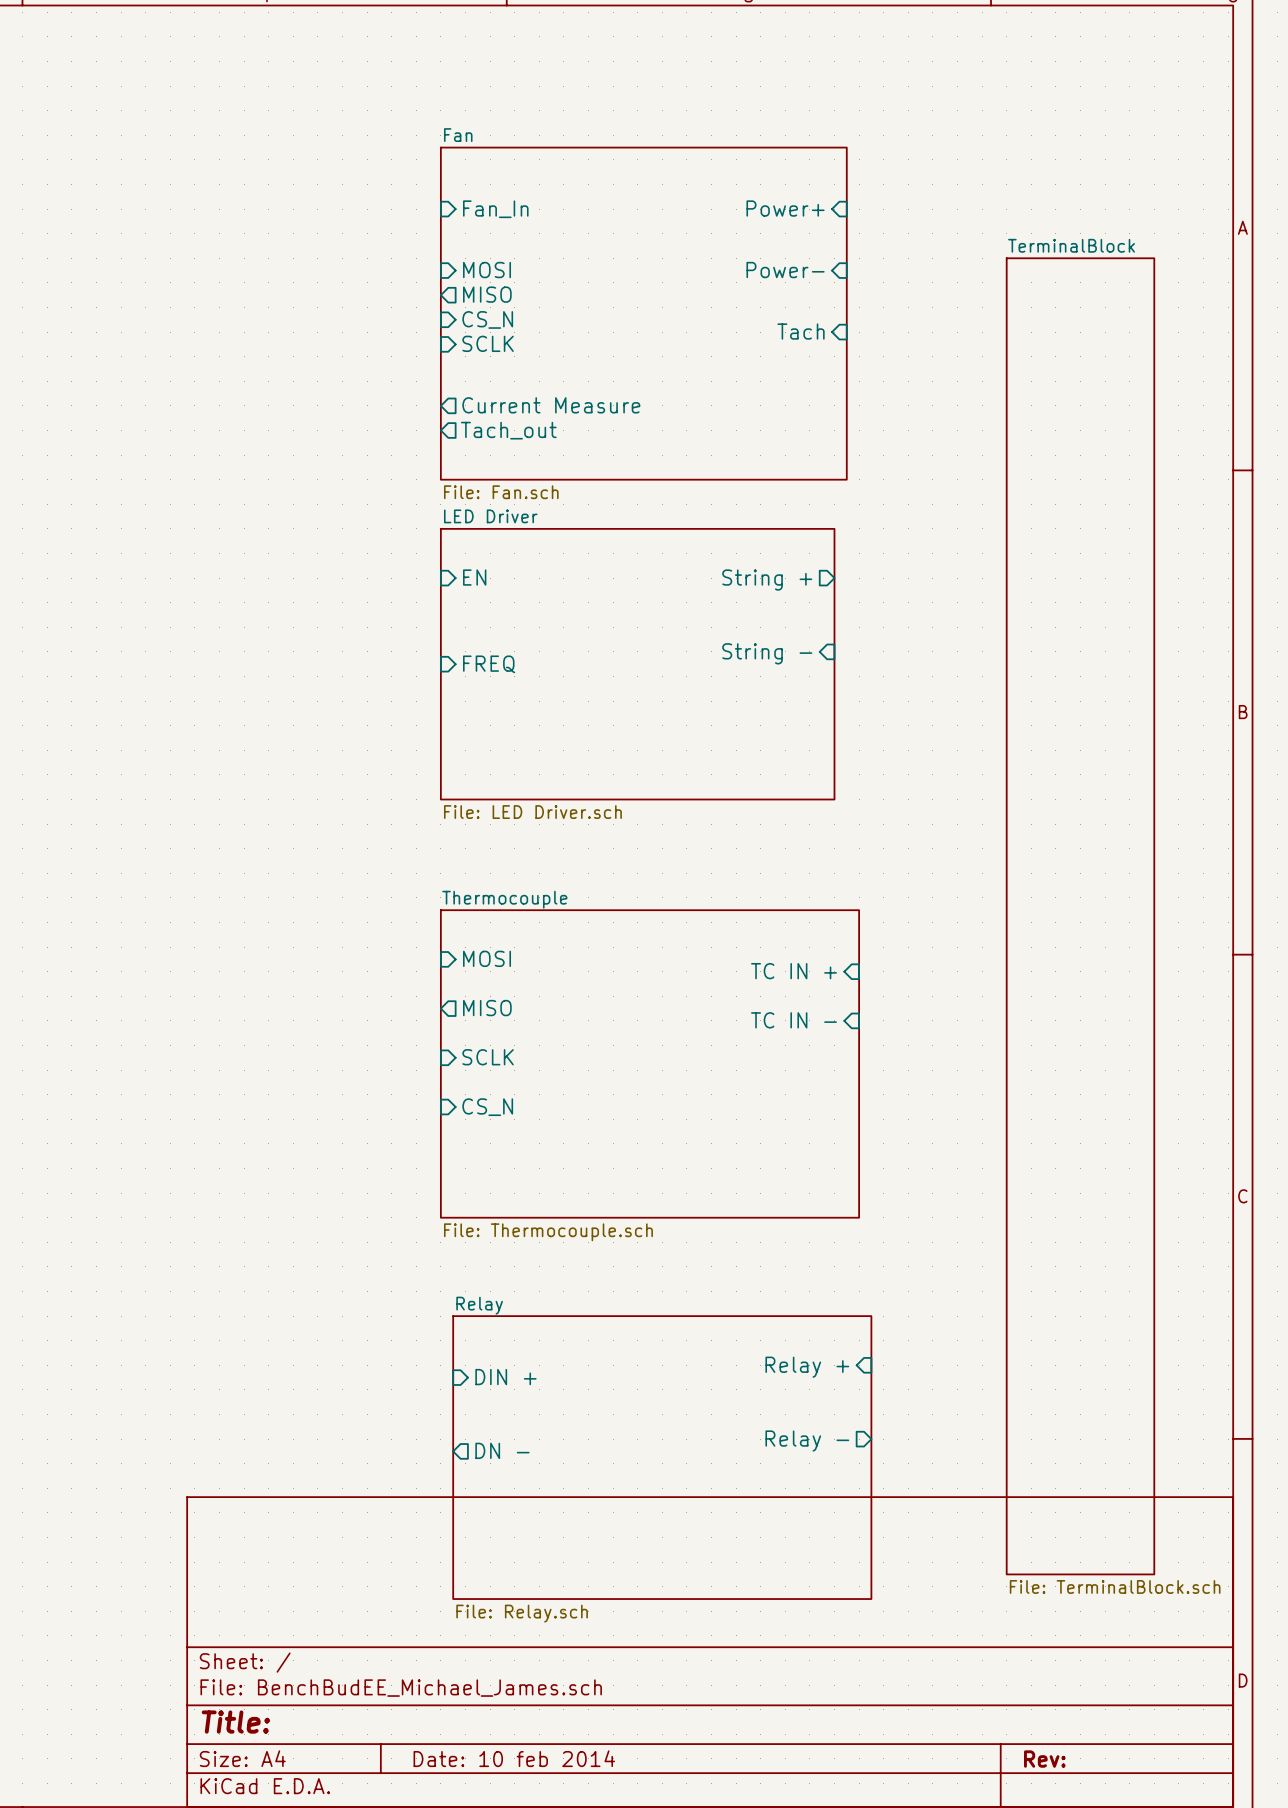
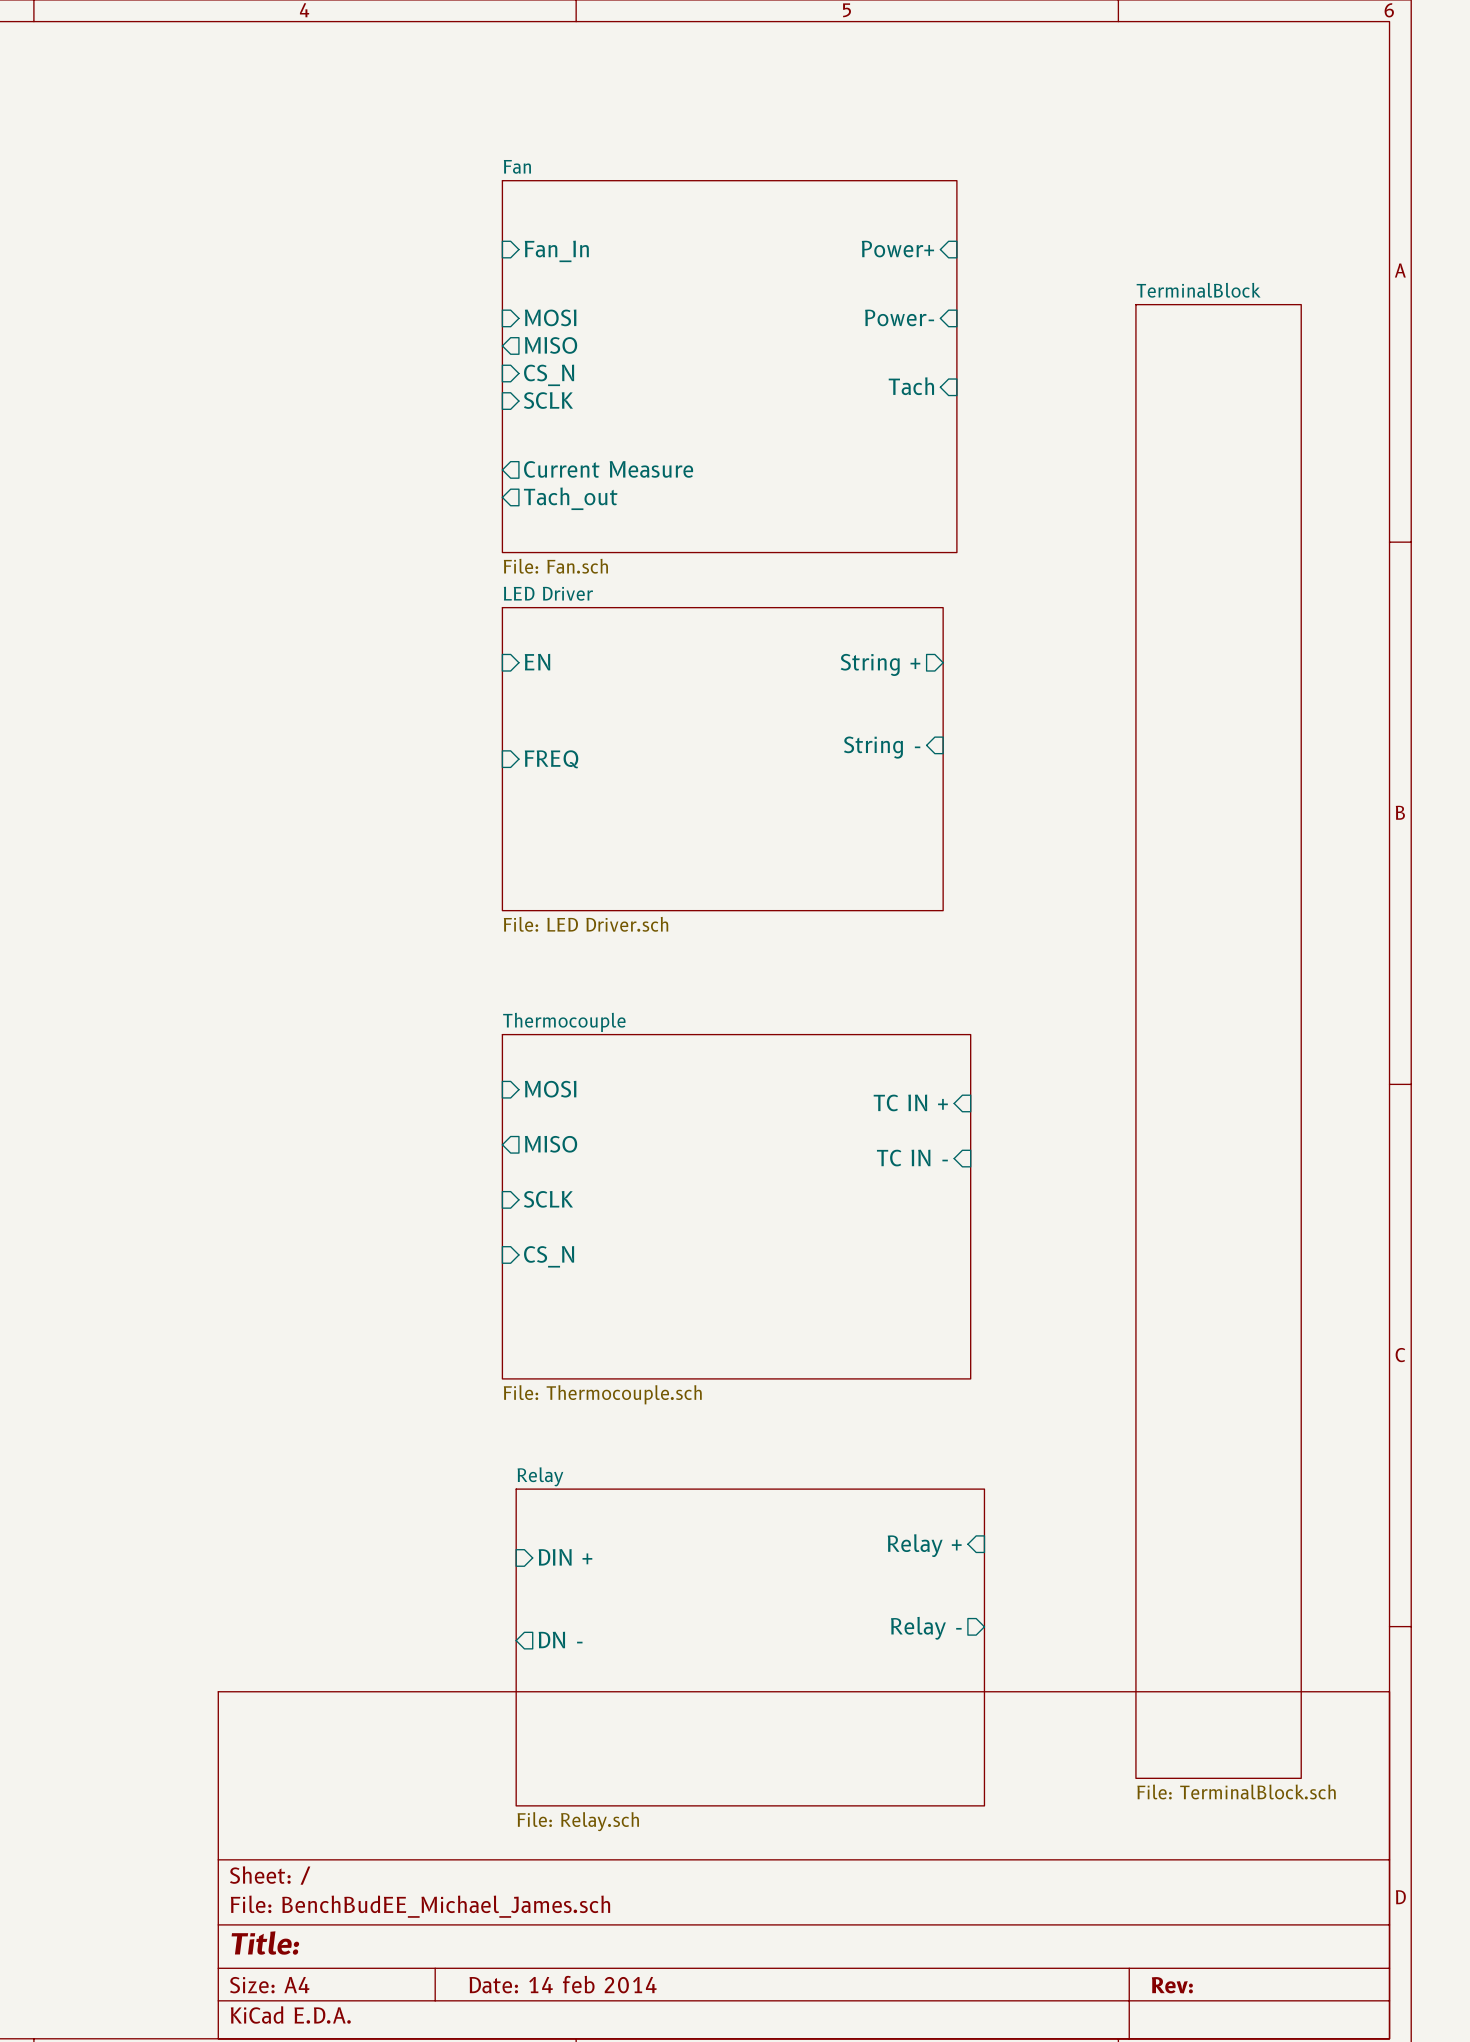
title block: Date: 10 feb 2014 (514, 1758) -> Date: 14 feb 2014 (563, 1984)

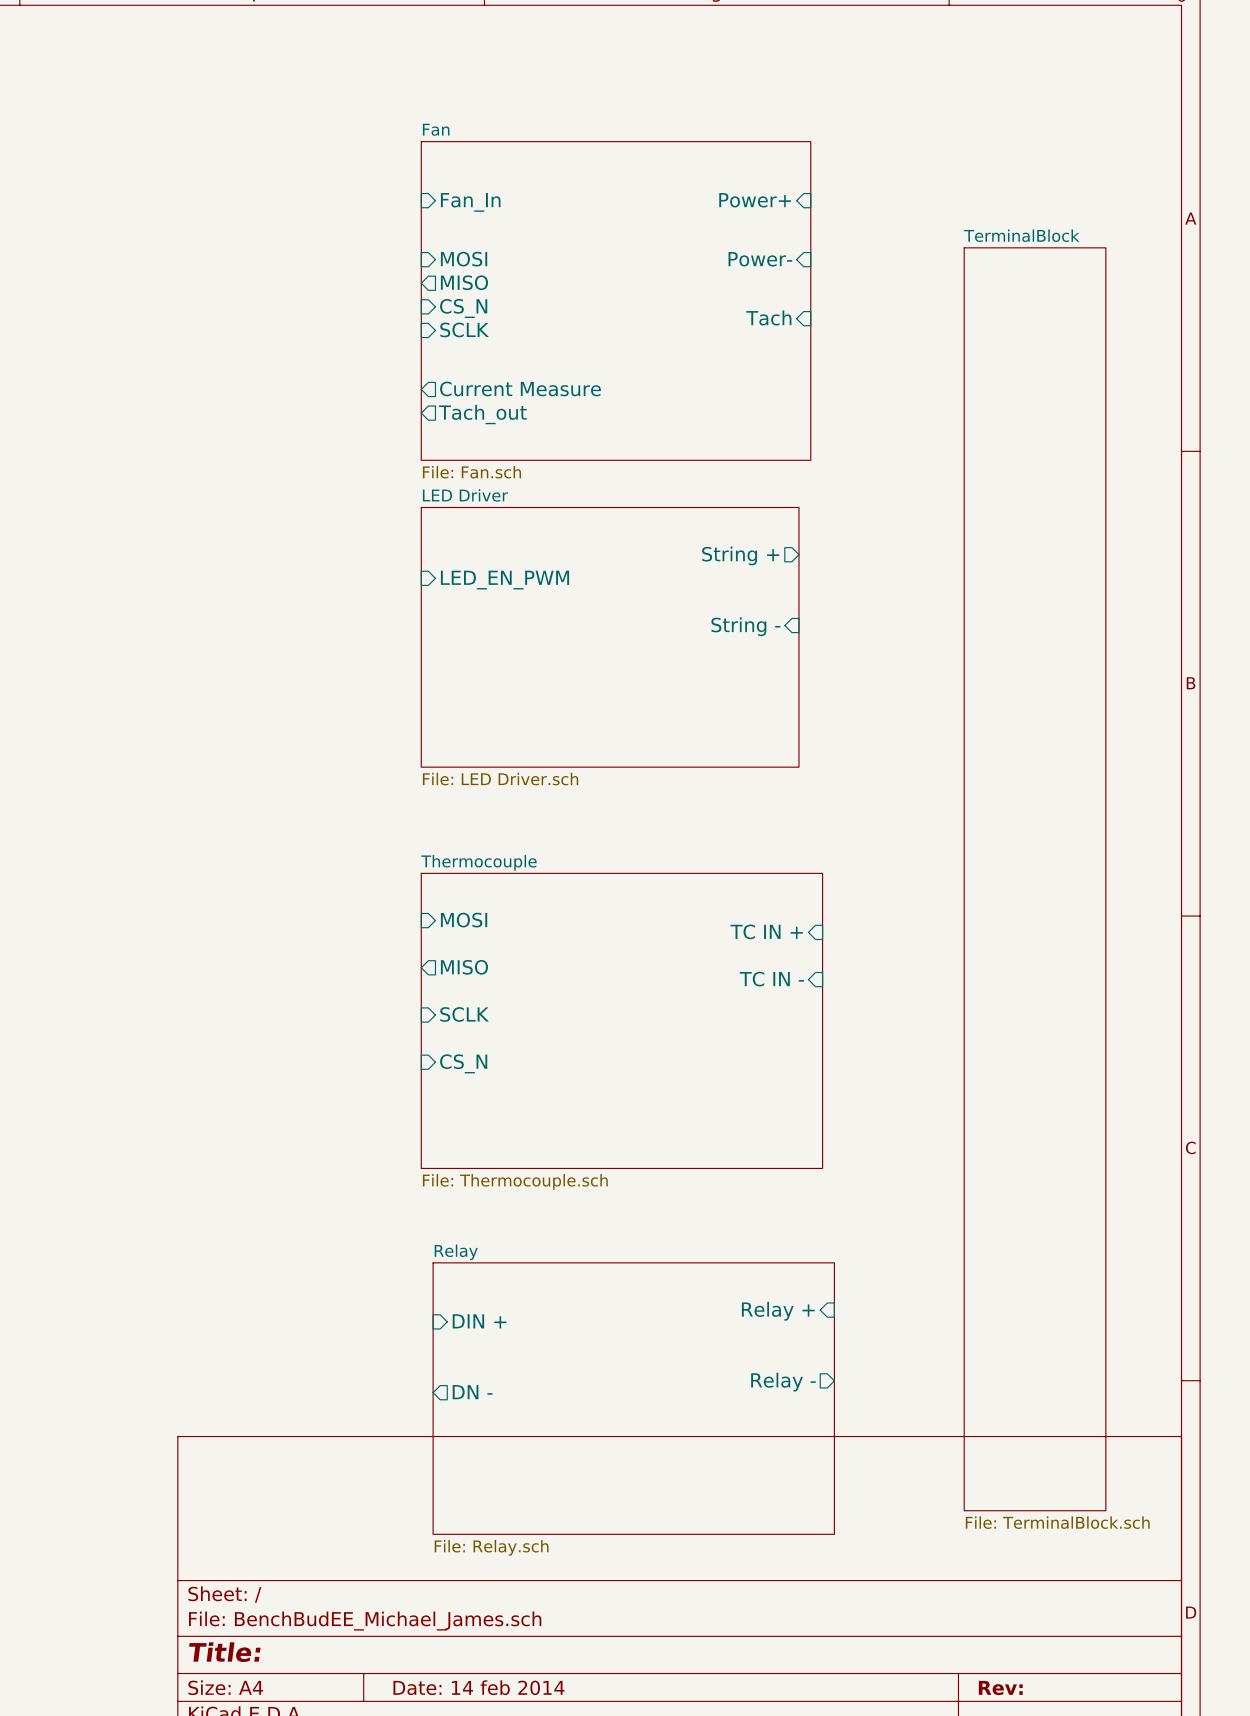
sheet pin: EN (537, 662) -> none
sheet pin: none -> LED_EN_PWM (504, 580)
sheet pin: FREQ (551, 759) -> none

